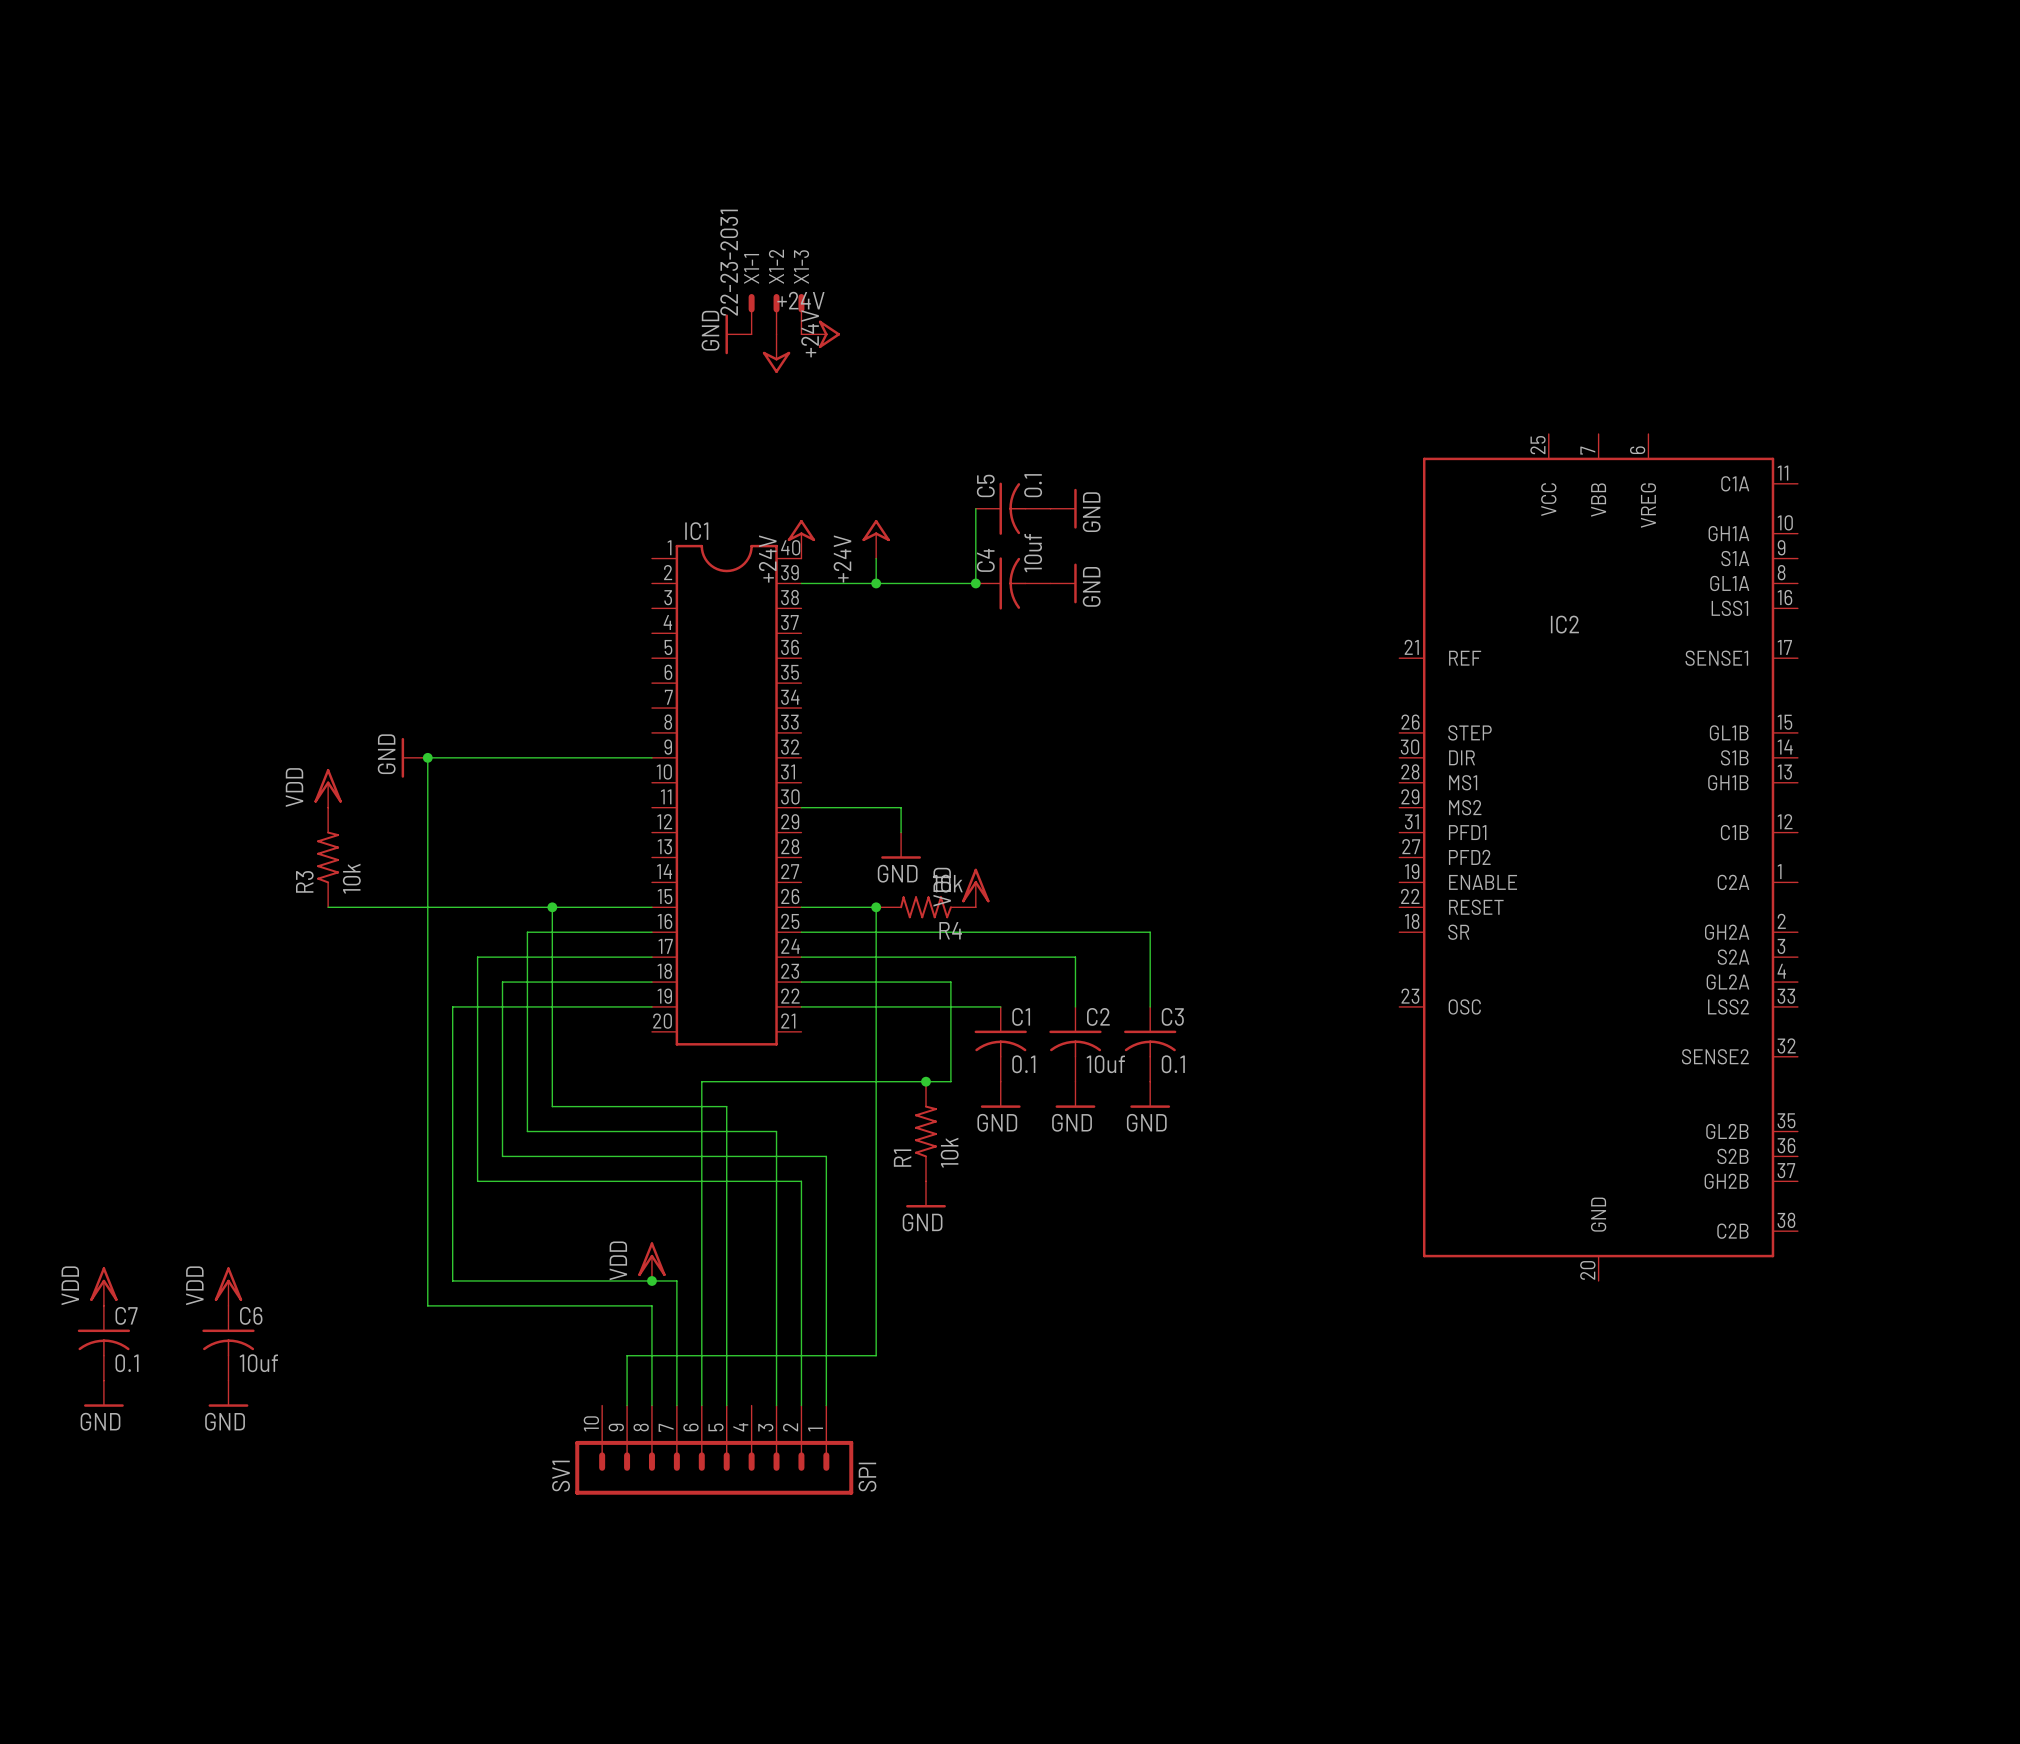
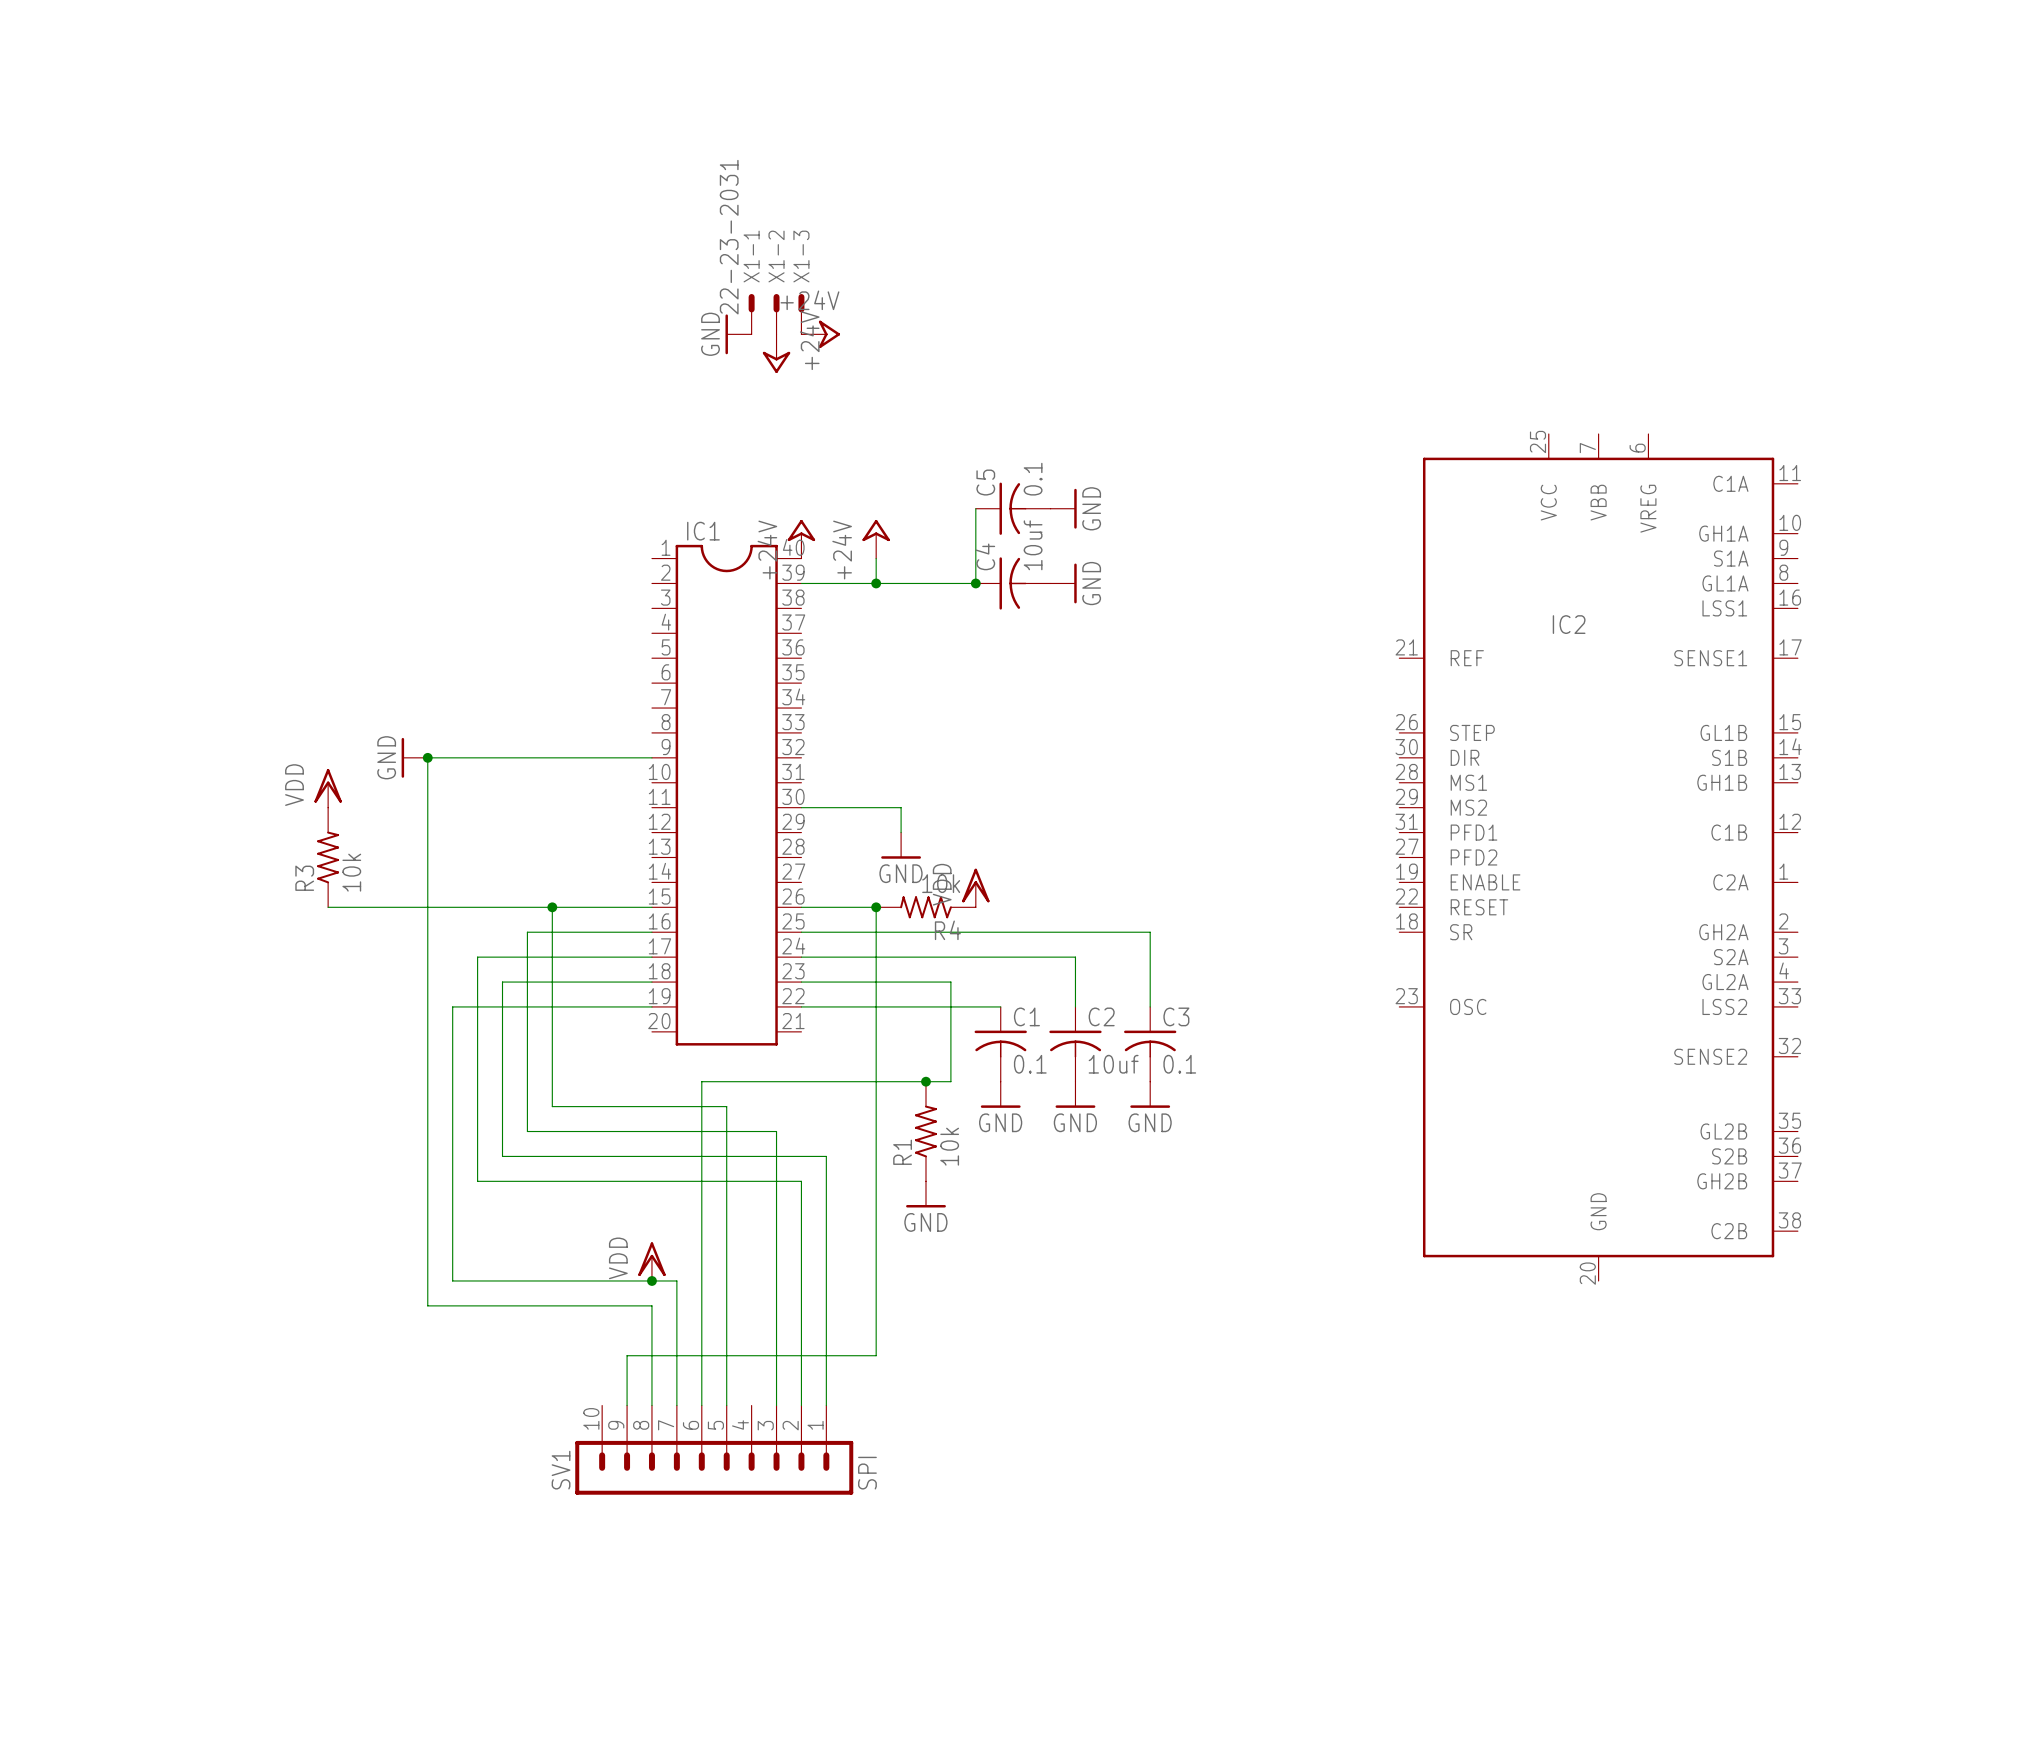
power symbol: VDD (103, 1286) -> none
power symbol: VDD (228, 1286) -> none
C7: 0.1 (103, 1343) -> none
C6: 10uf (228, 1343) -> none
power symbol: GND (103, 1393) -> none
power symbol: GND (228, 1393) -> none

